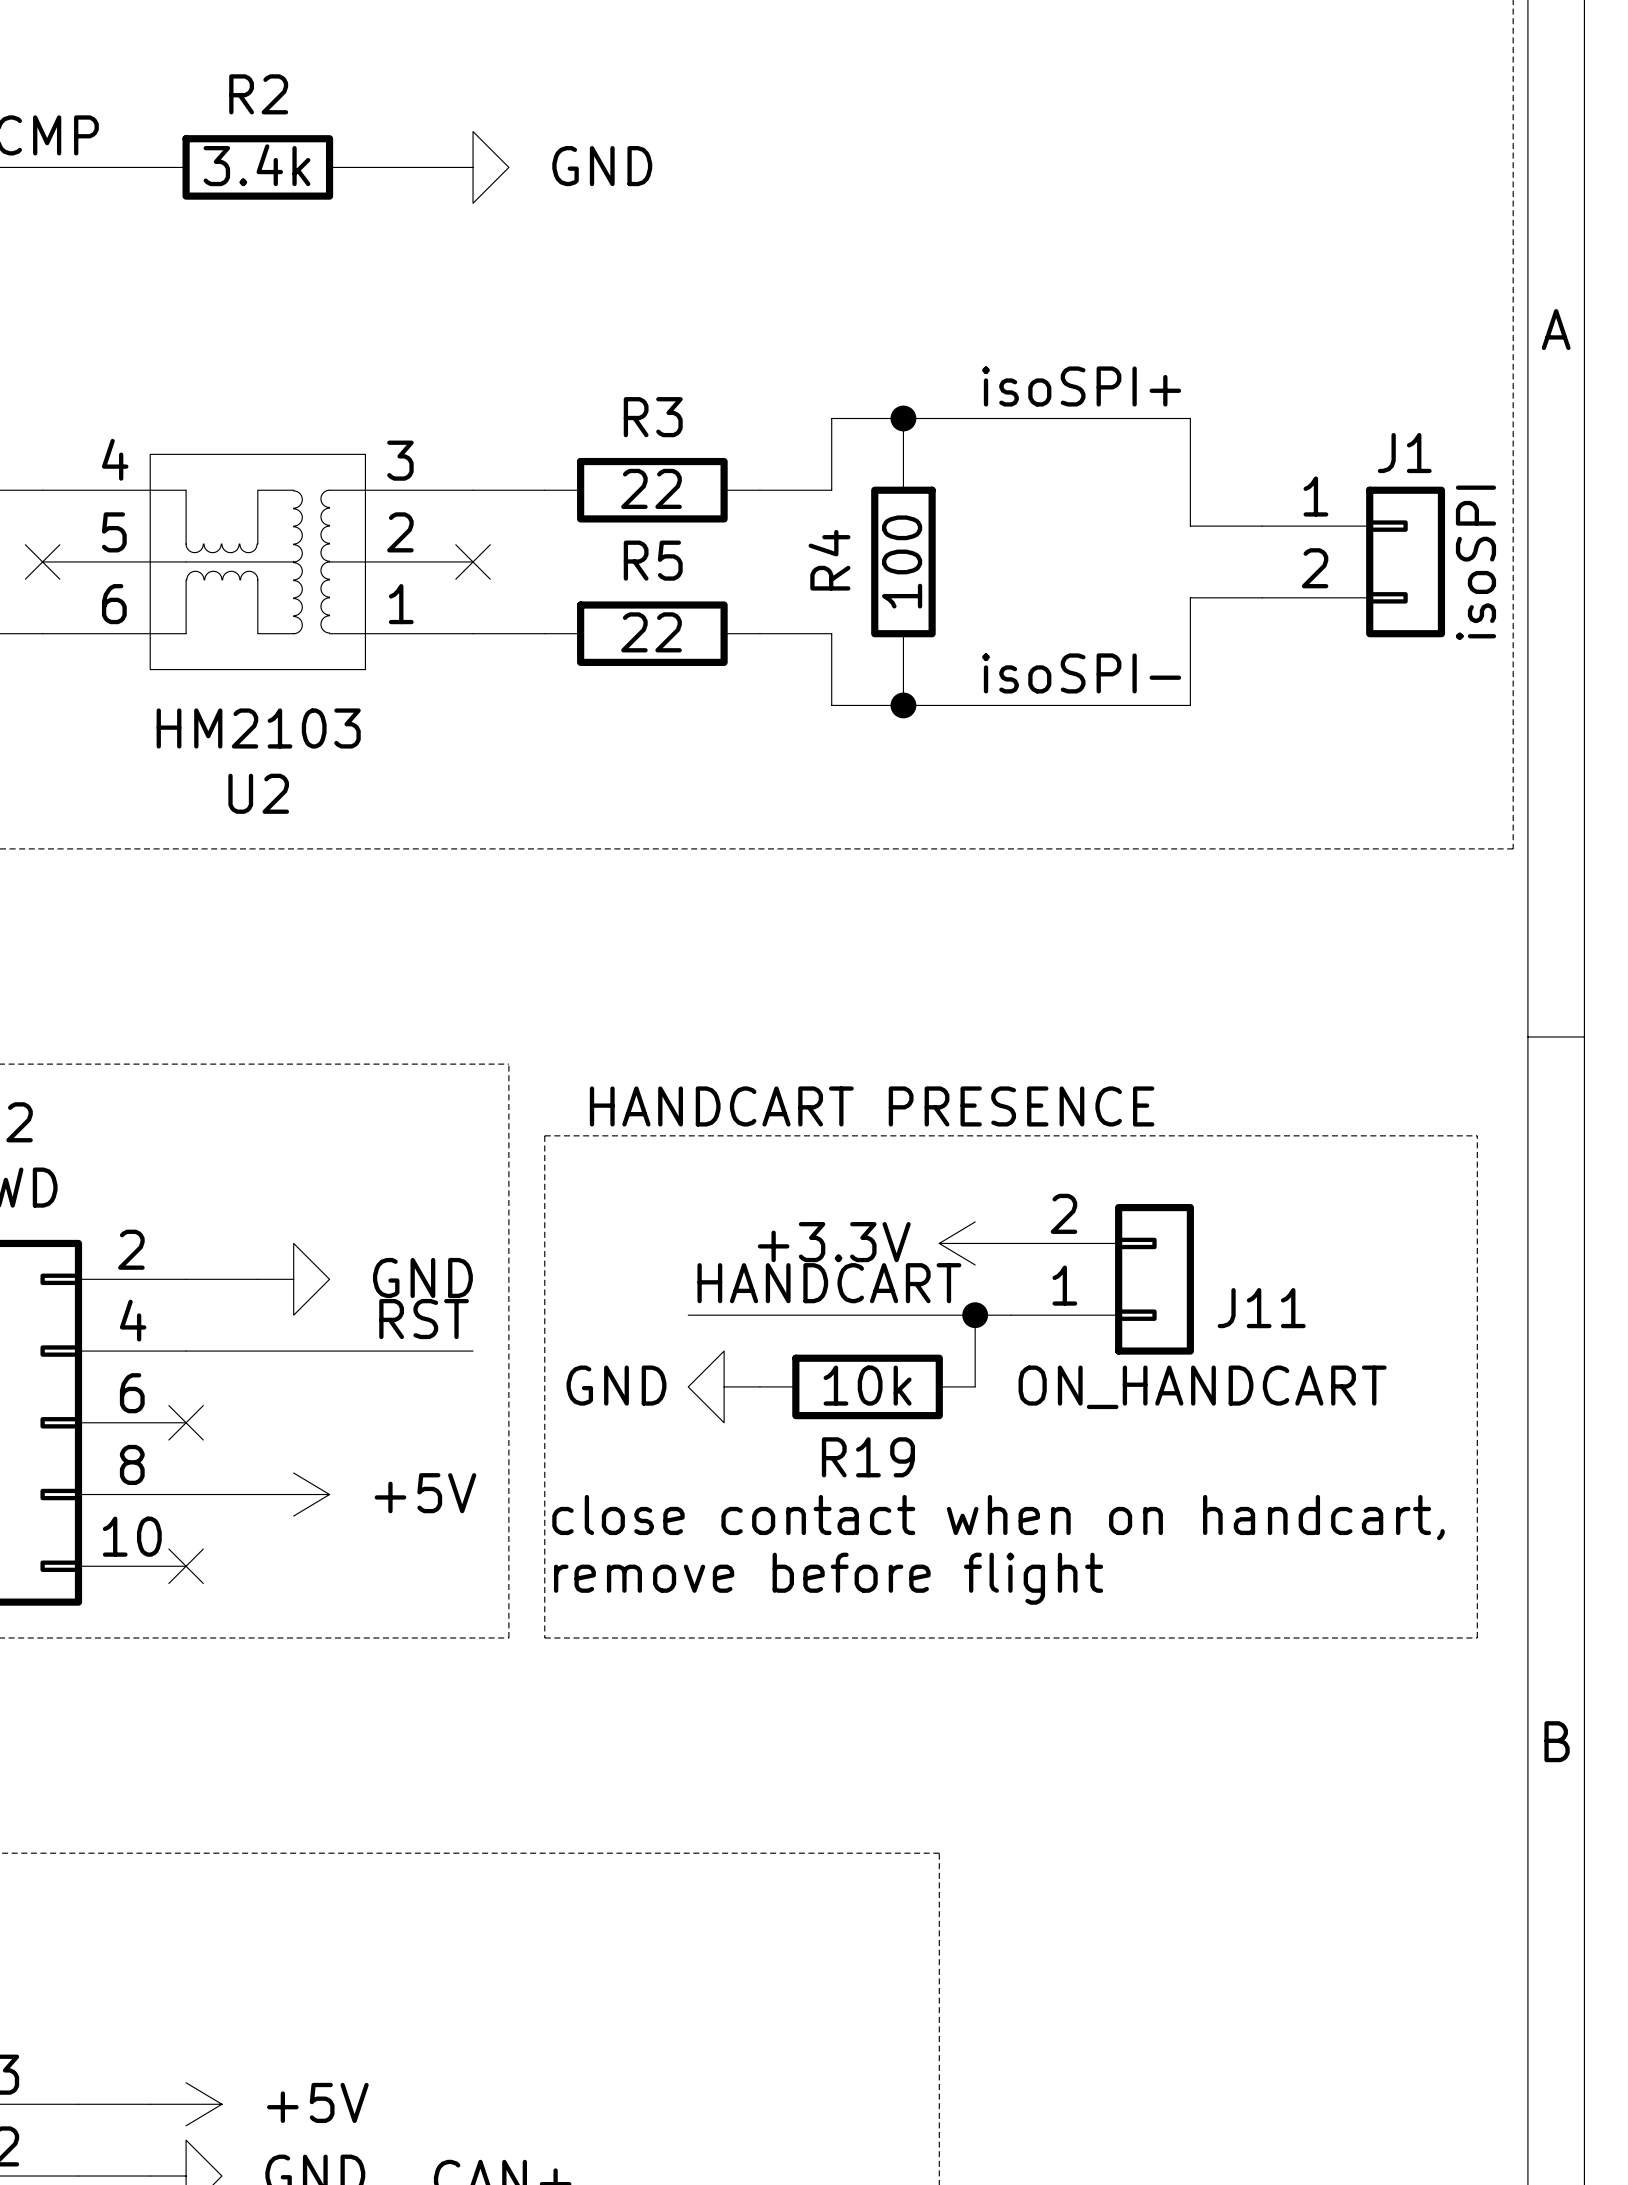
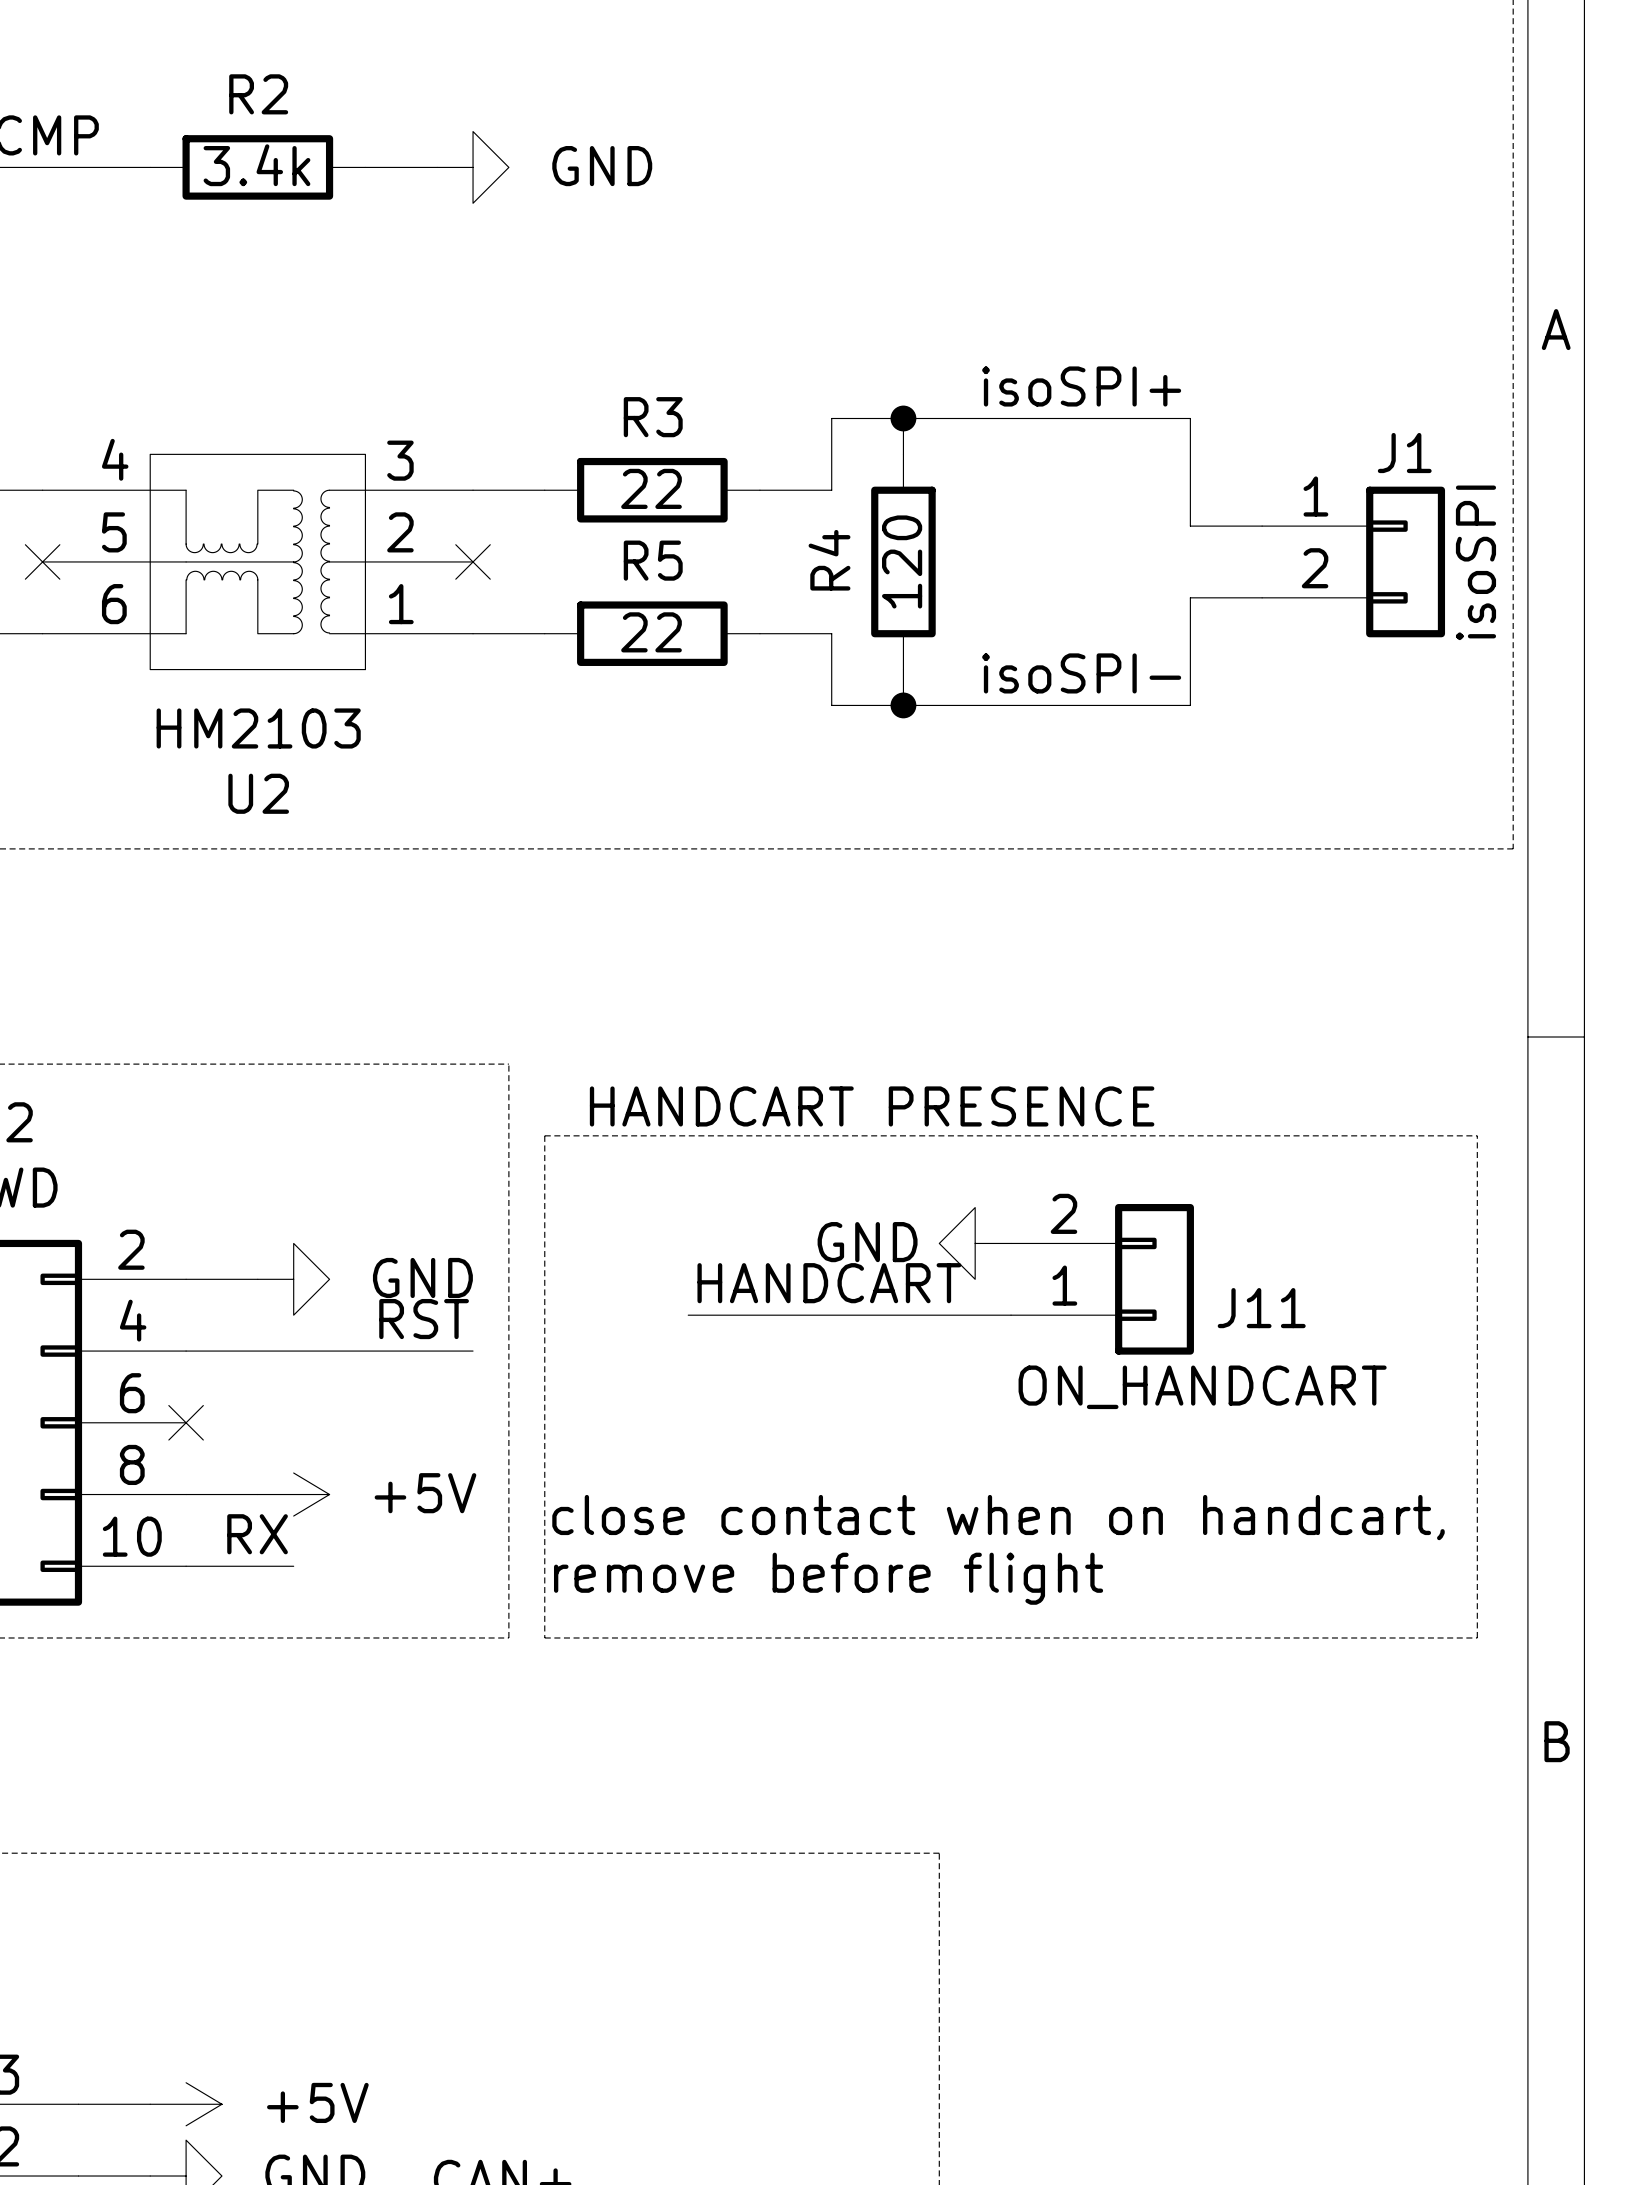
R4 value: 100 (902, 561) -> 120 (902, 561)
power symbol: +3.3V (975, 1243) -> GND (975, 1243)
wire: (975, 1315) (975, 1386) -> none
junction: (975, 1315) -> none
power symbol: GND (724, 1386) -> none
R19: 10k (867, 1386) -> none
label: none -> RX (257, 1534)
wire: none -> (186, 1566) (293, 1566)
no-connect mark: (186, 1566) -> none

